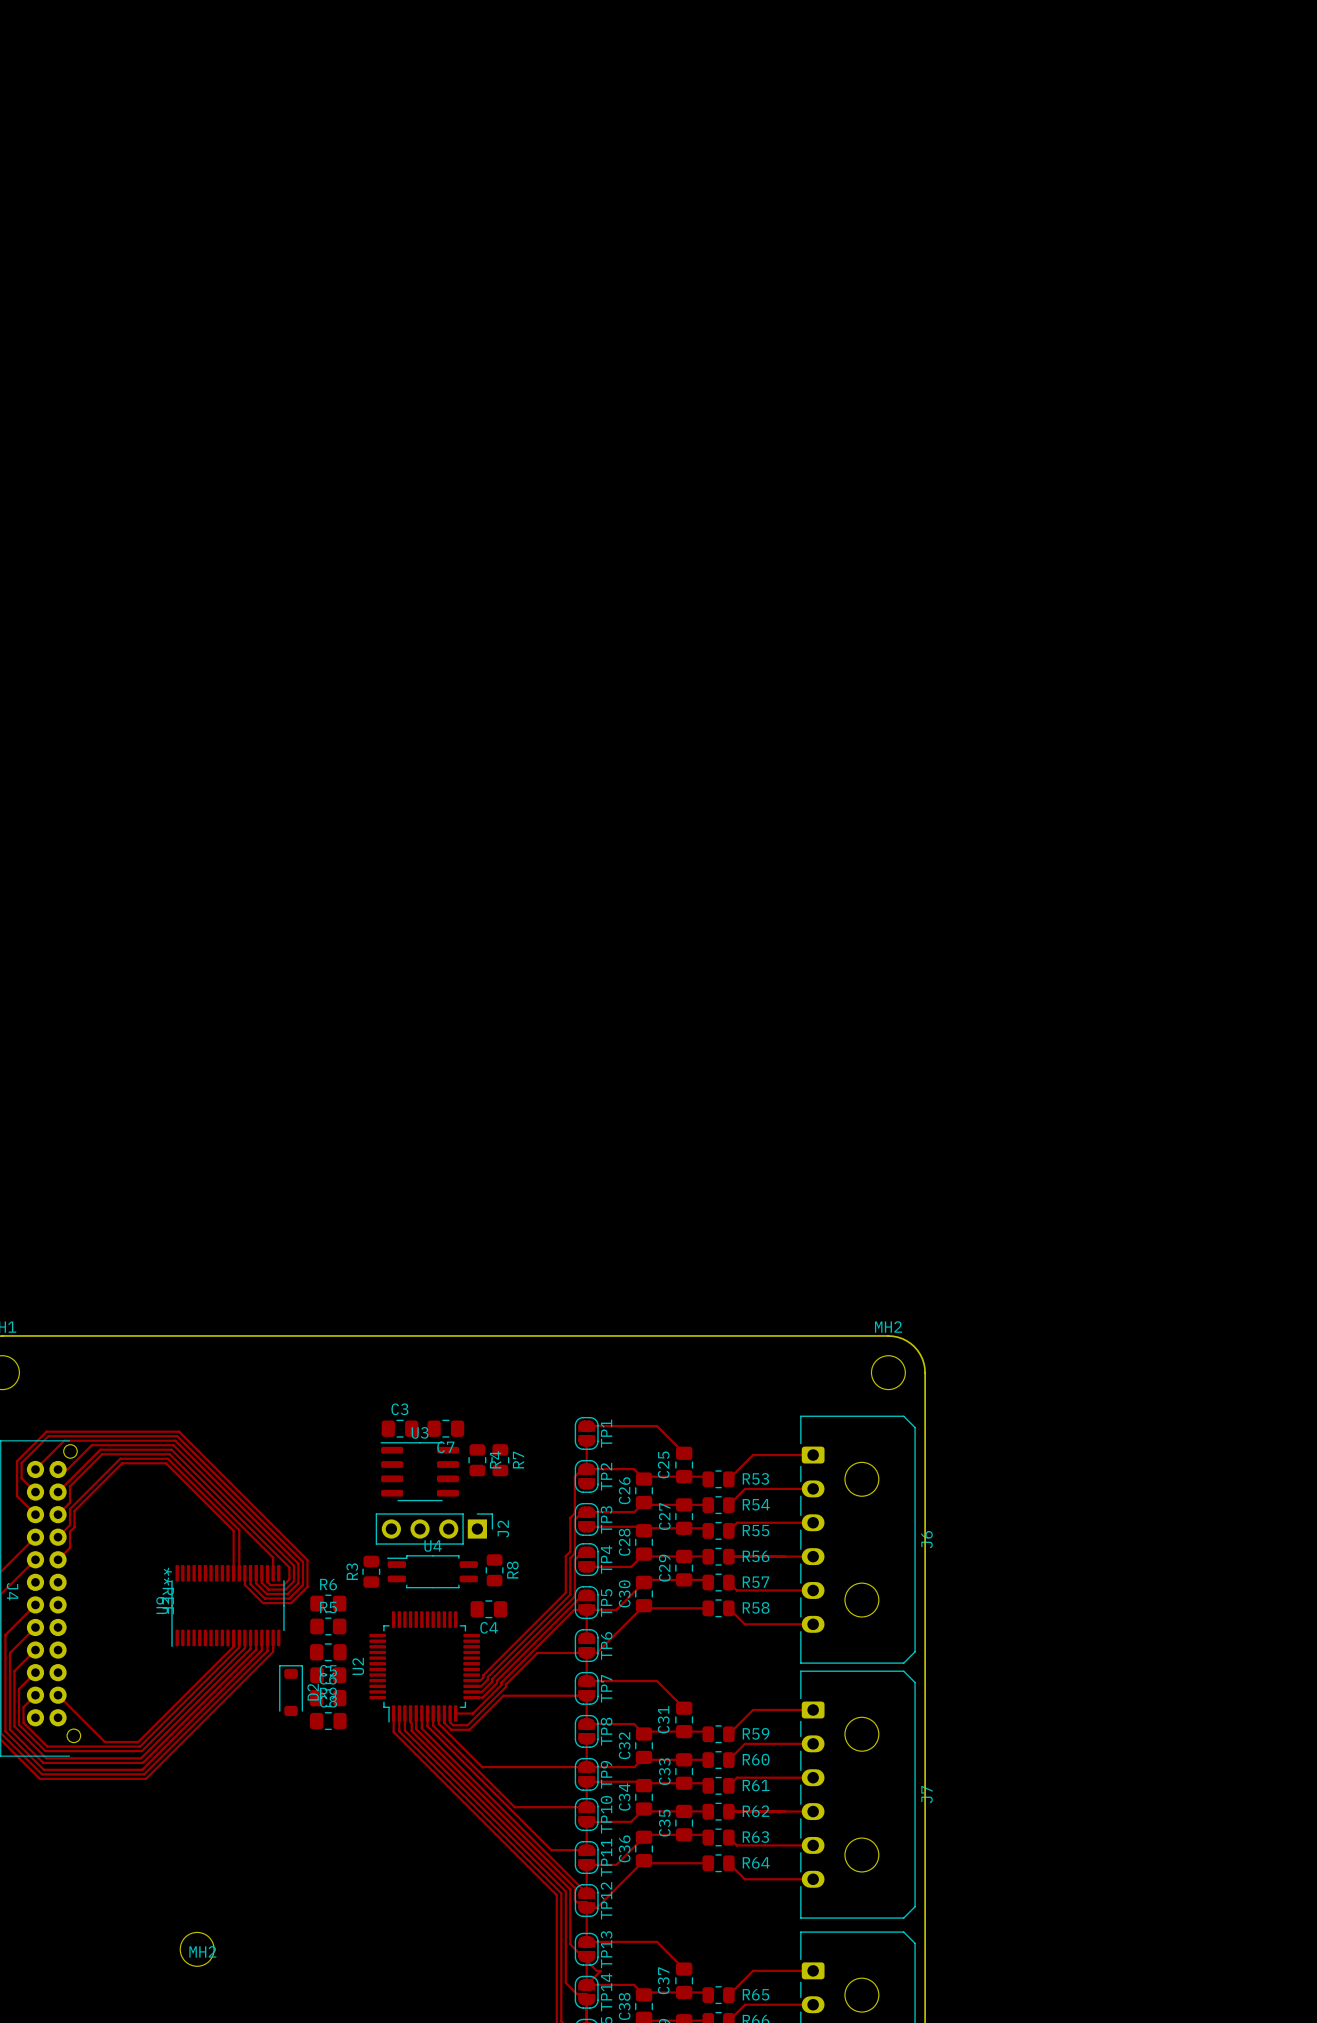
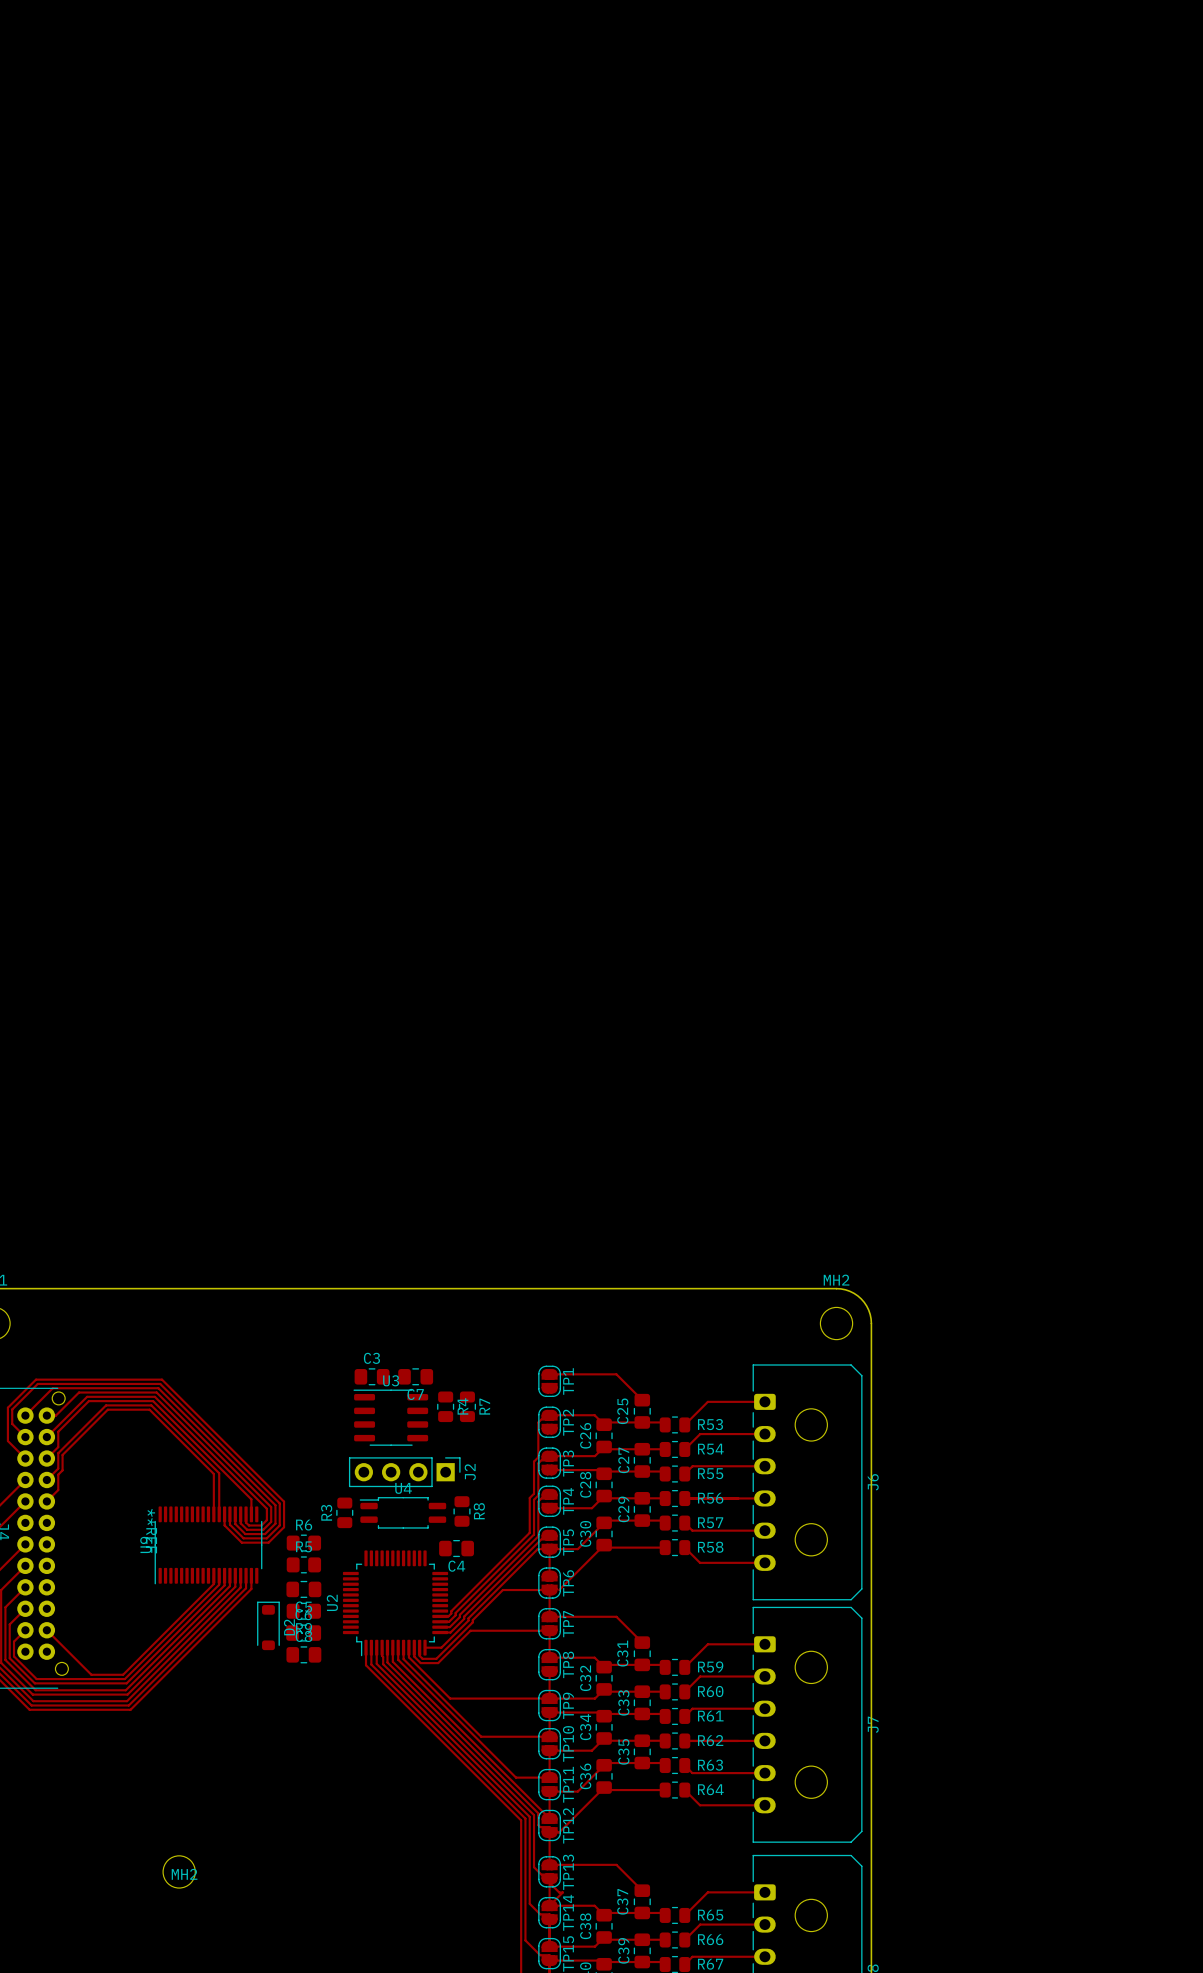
track: (586, 1440) (586, 1469) -> none

